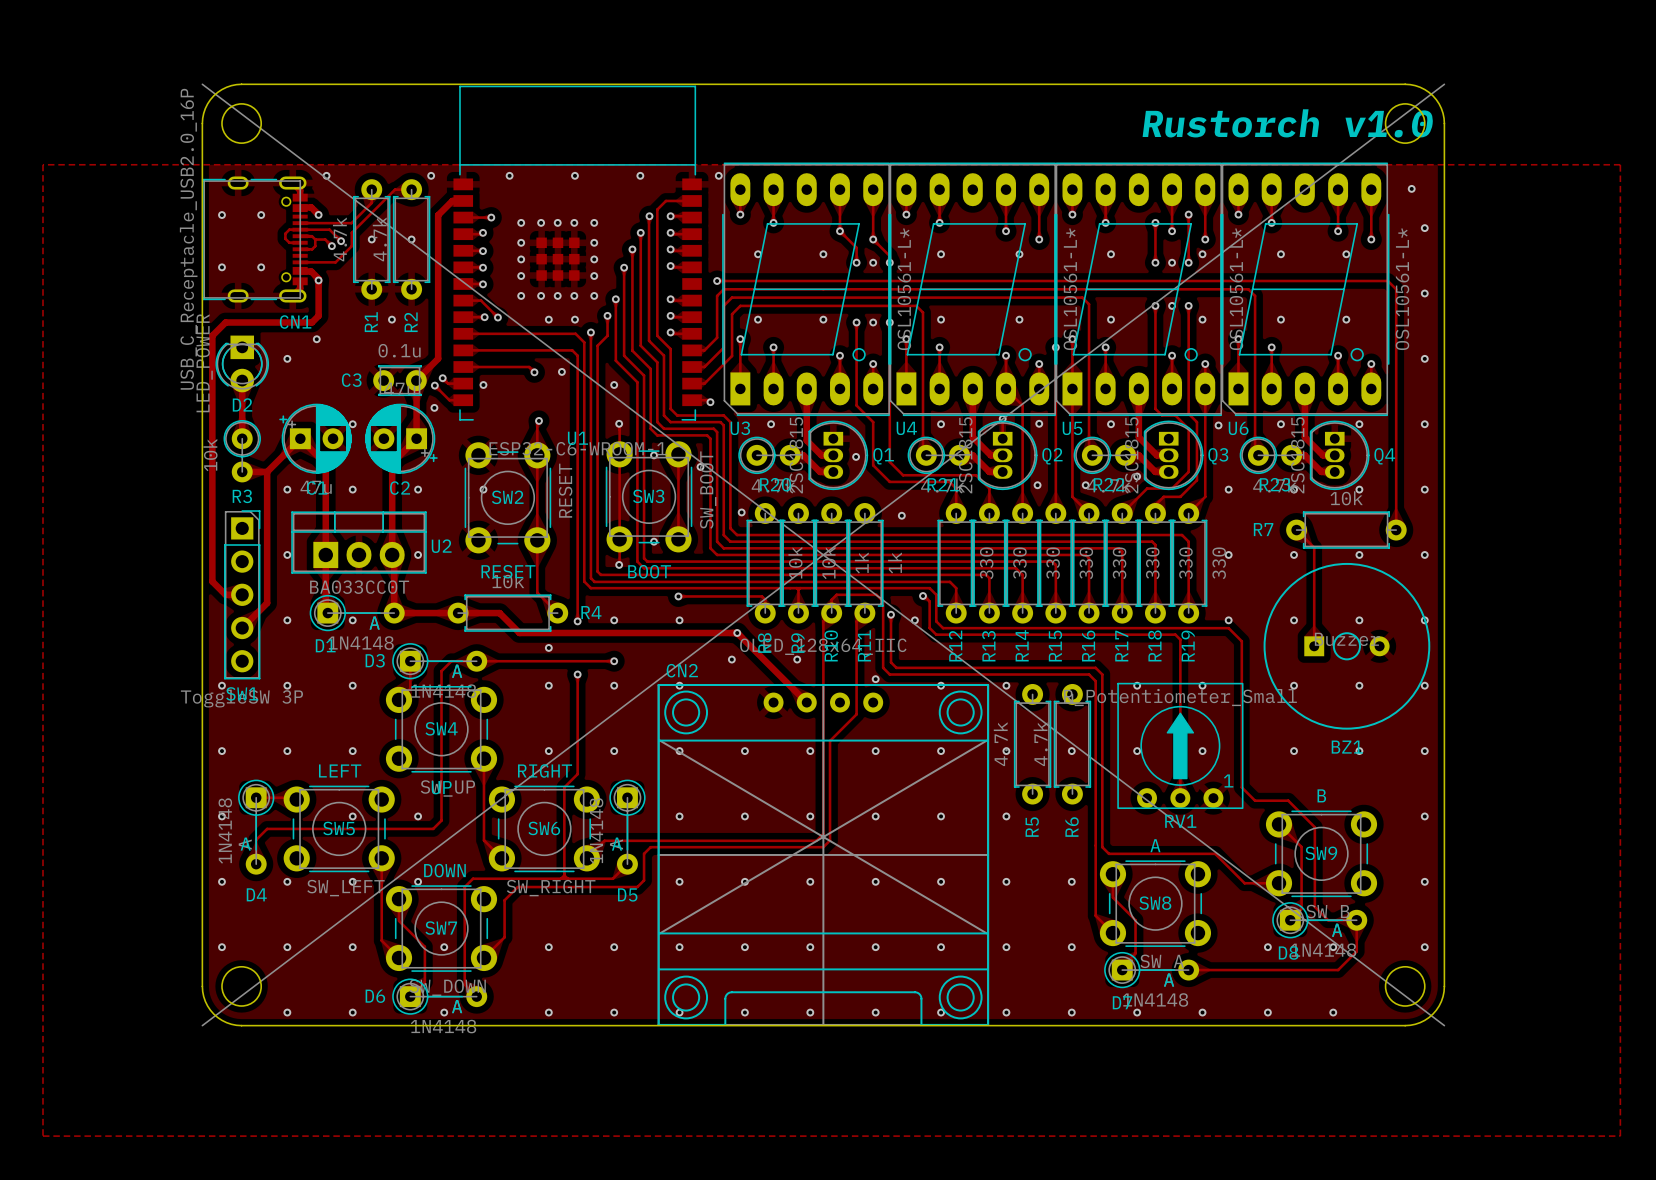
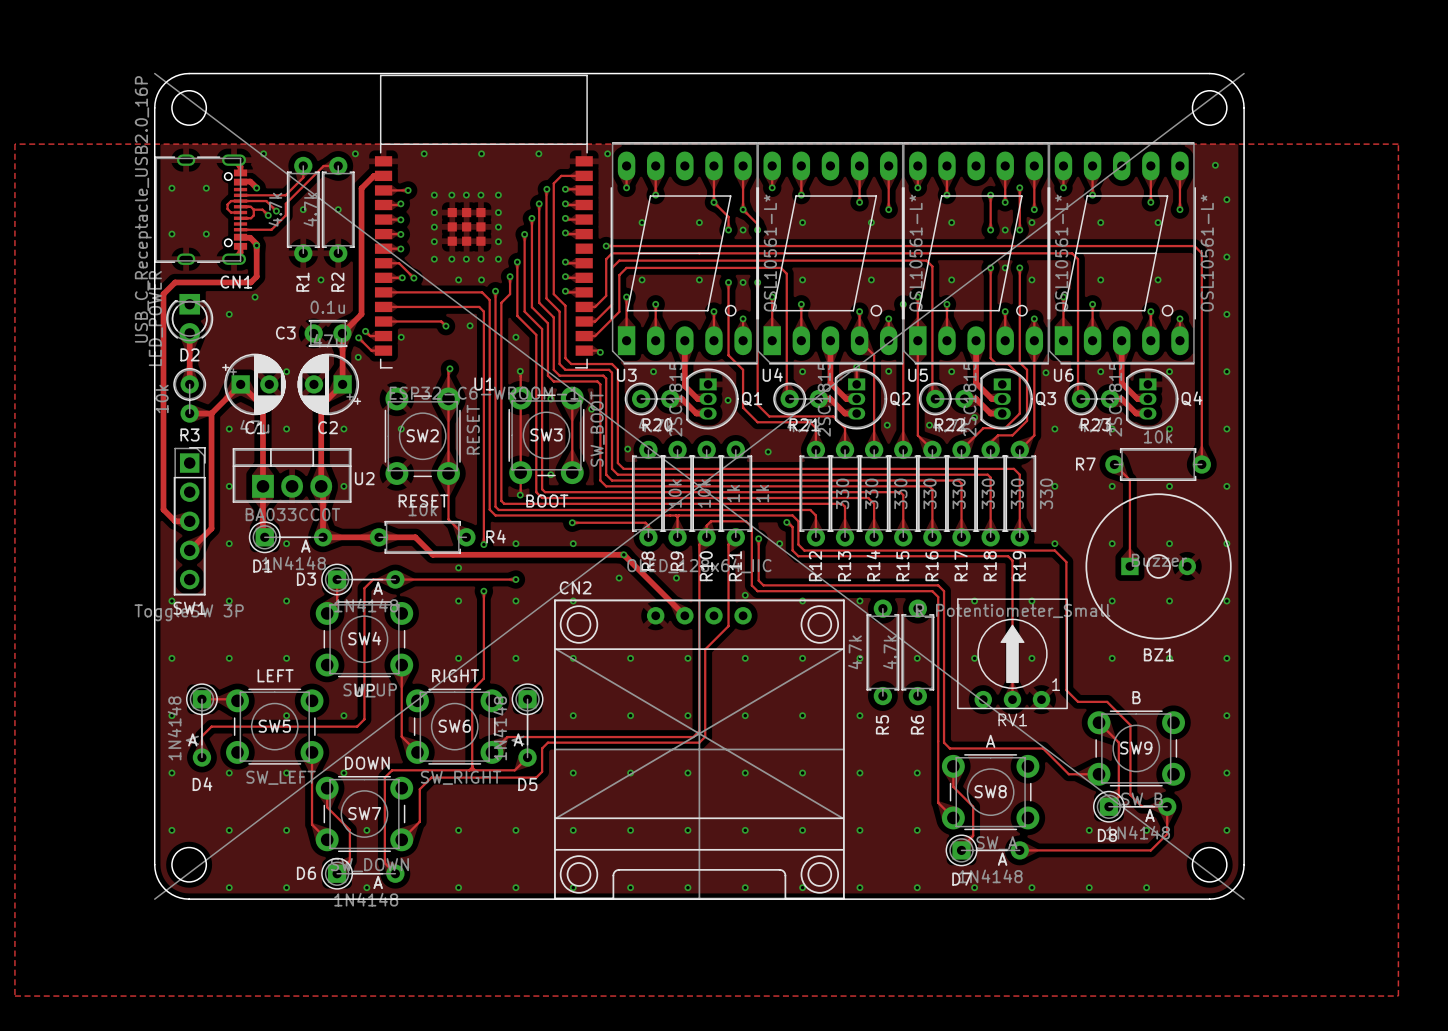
text: Rustorch v1.0 (1288, 123) -> none

